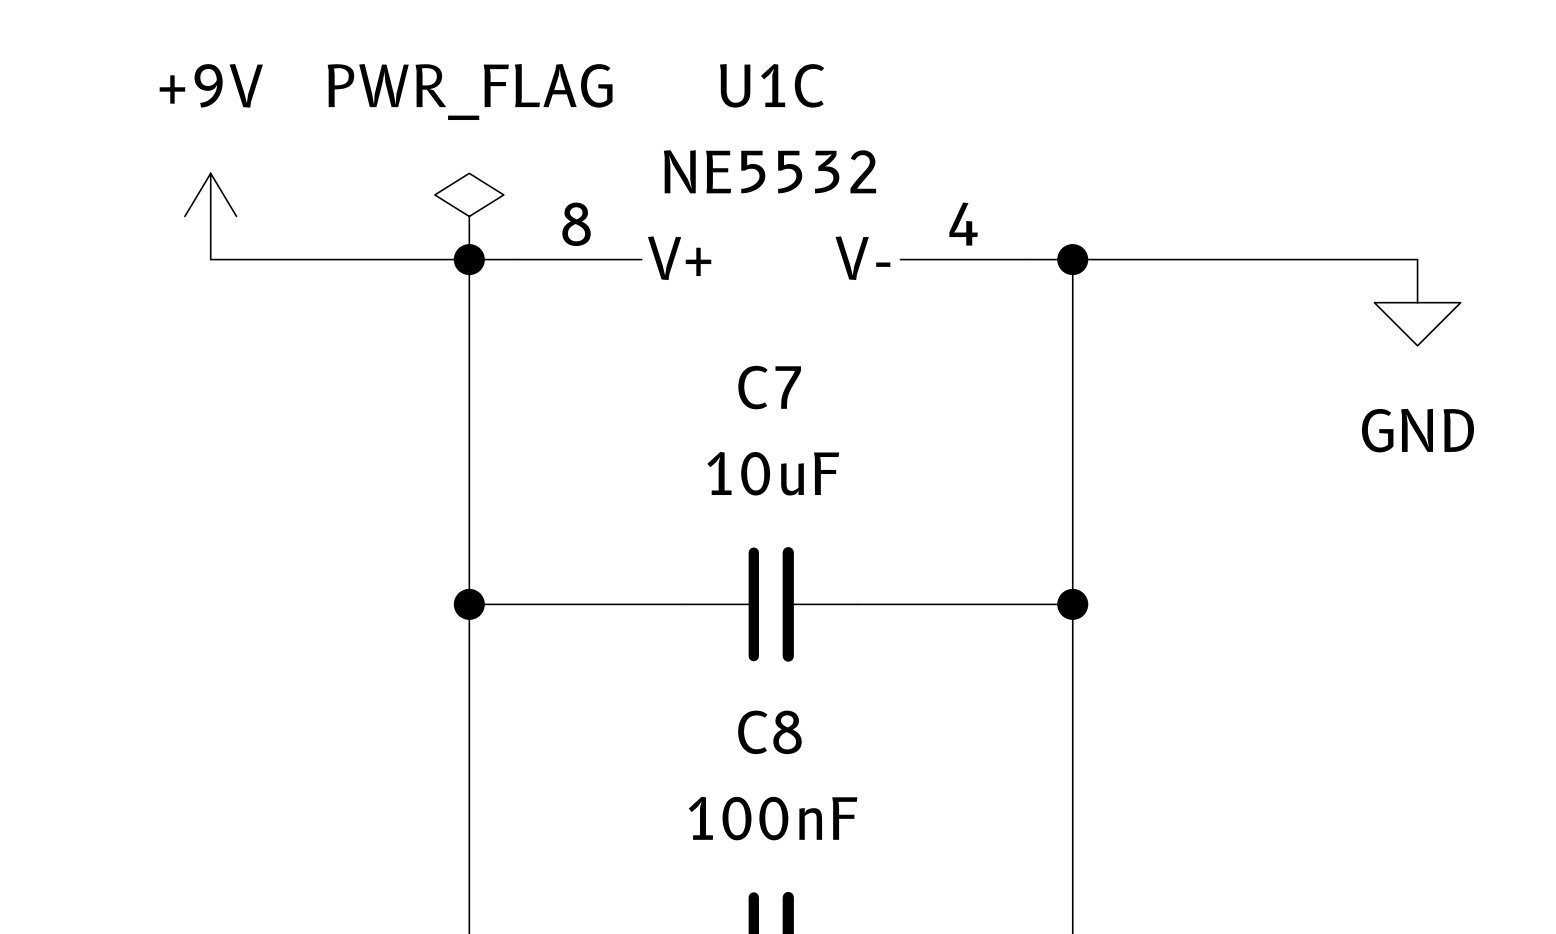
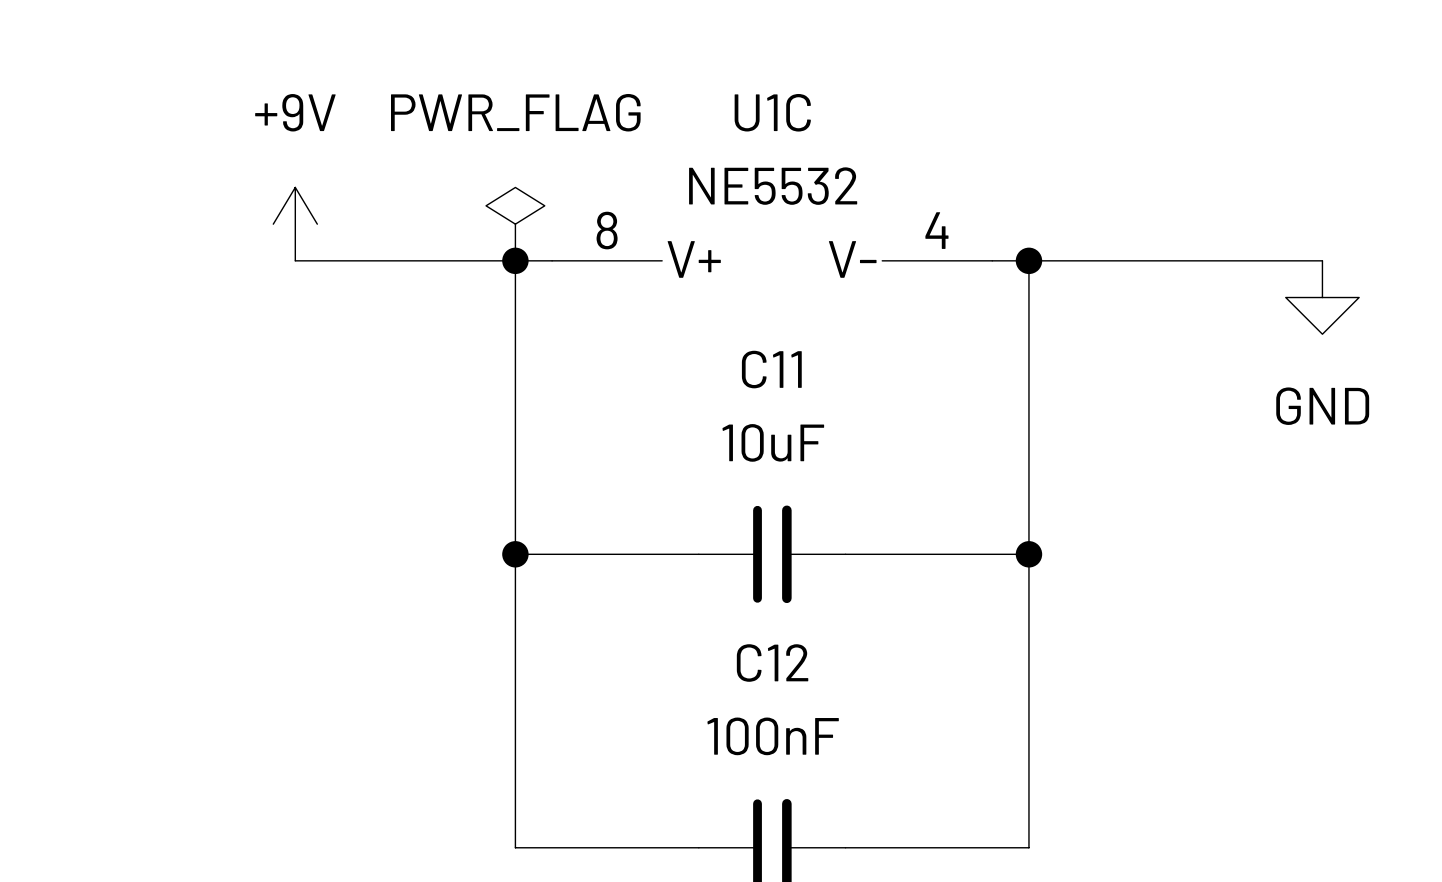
C7 name: C7 (769, 387) -> C11 (771, 369)
C8 name: C8 (769, 732) -> C12 (772, 663)

